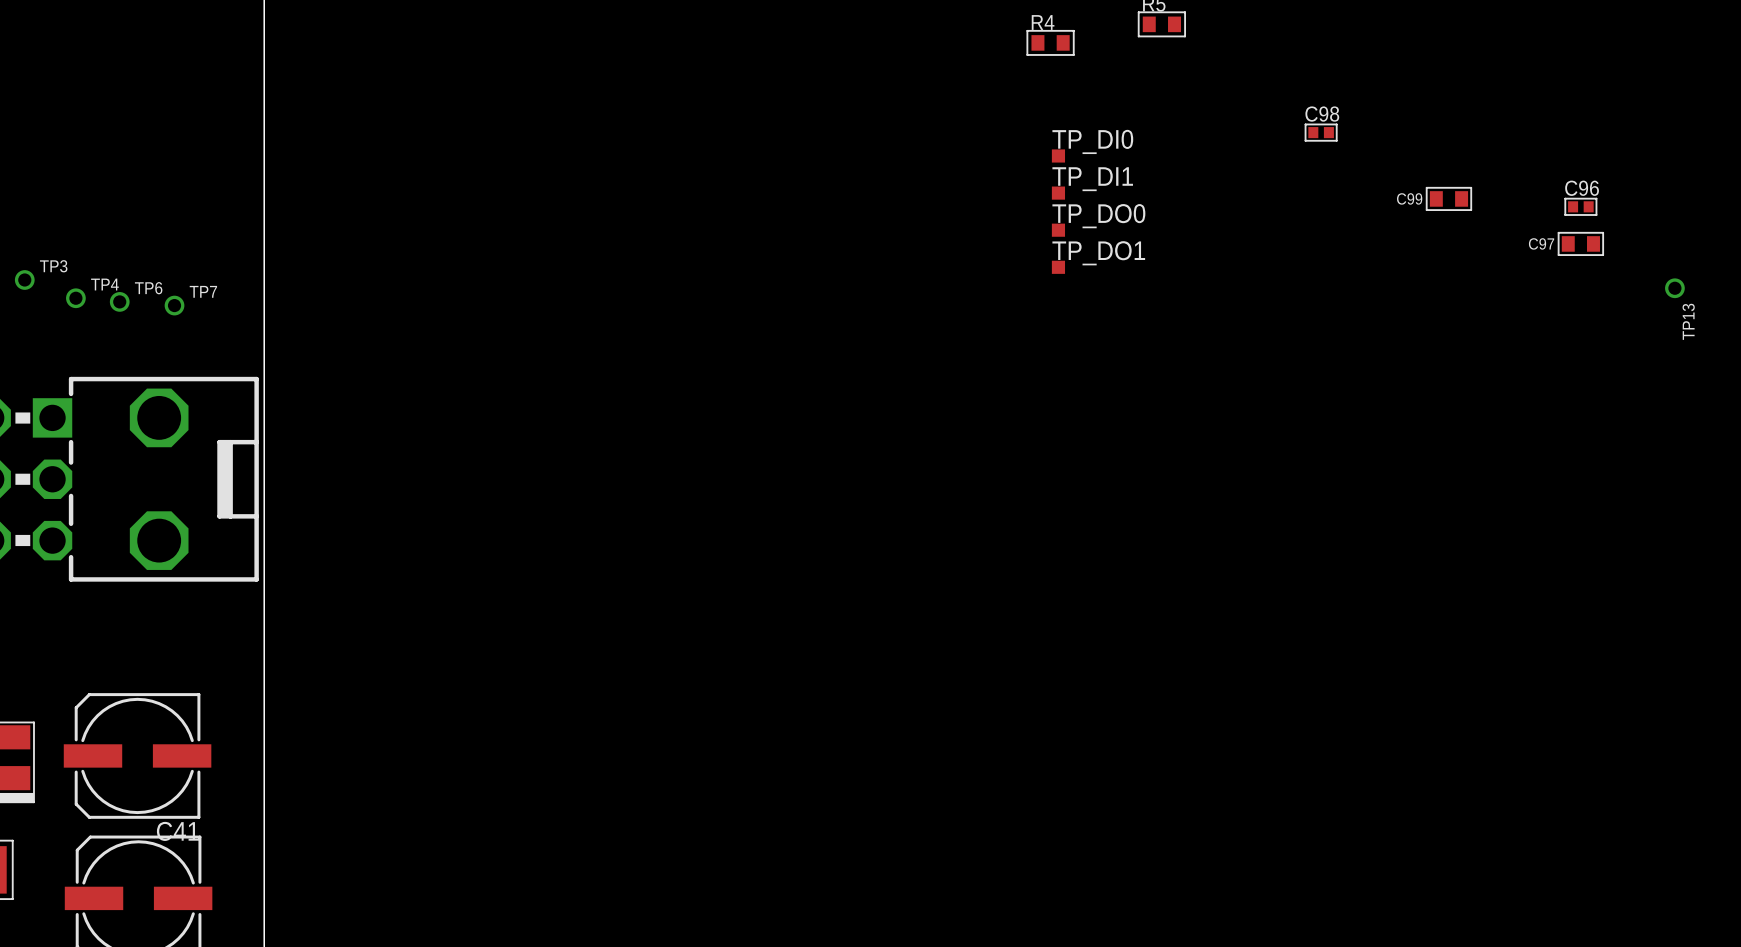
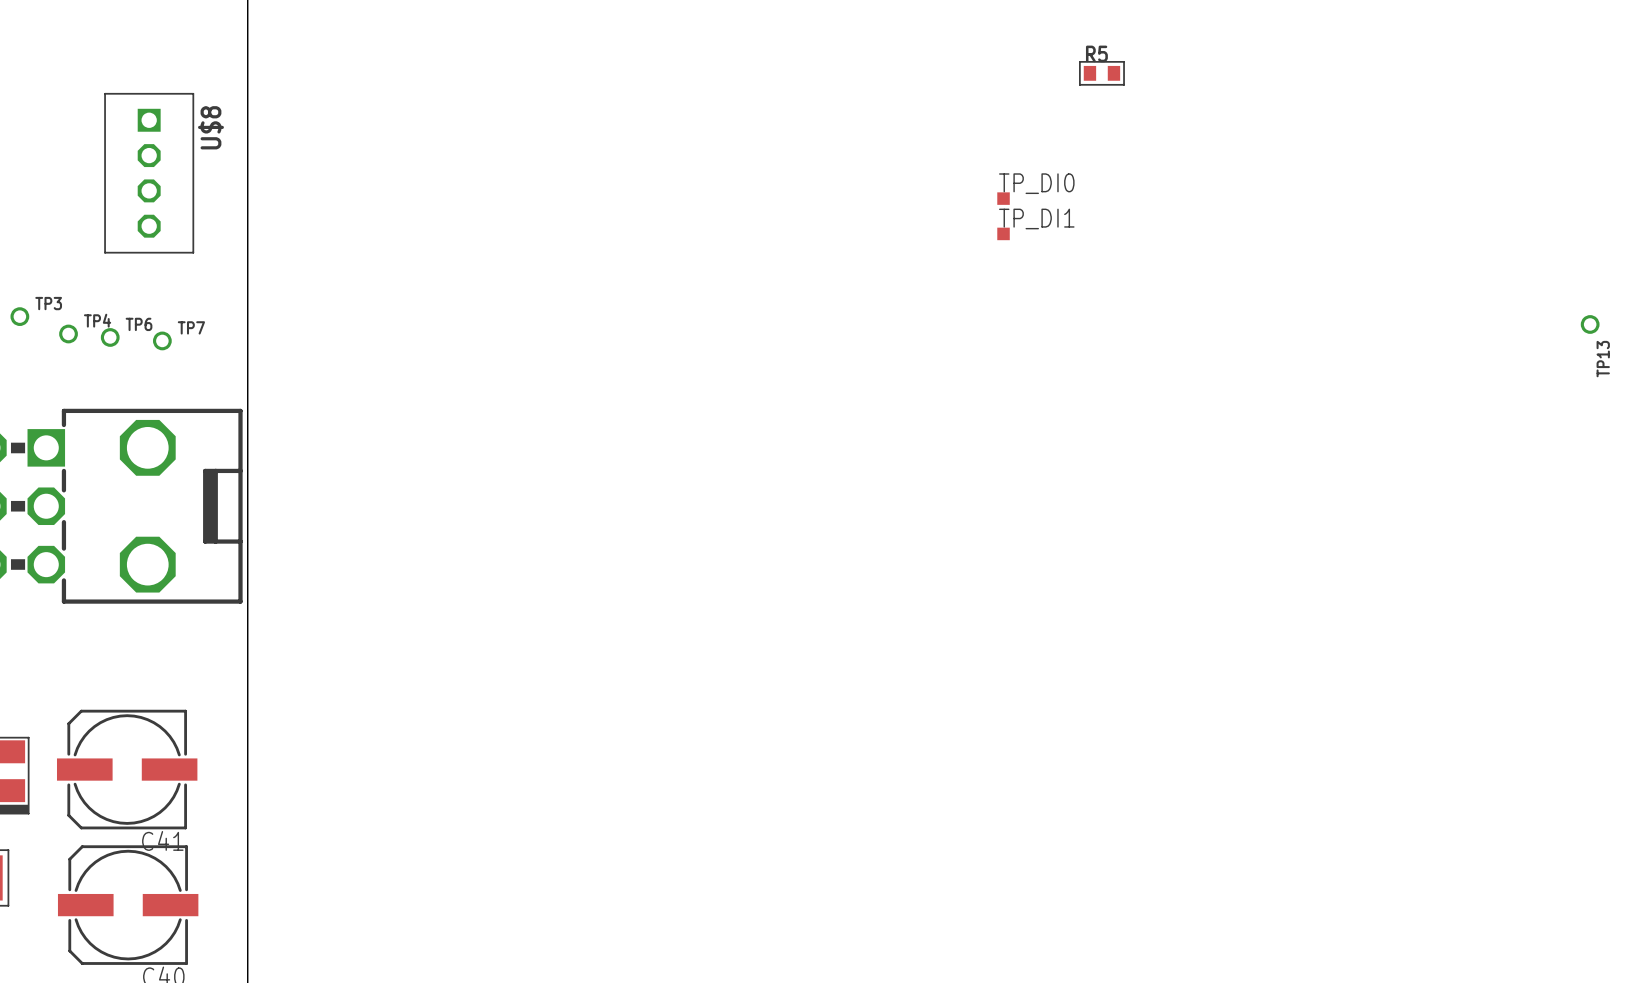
R4: (1050, 42) -> none
U$8: none -> (149, 173)
C98: (1321, 132) -> none
C99: (1448, 198) -> none
C96: (1580, 206) -> none
TP_DO0: (1058, 230) -> none
C97: (1580, 243) -> none
TP_DO1: (1058, 267) -> none

